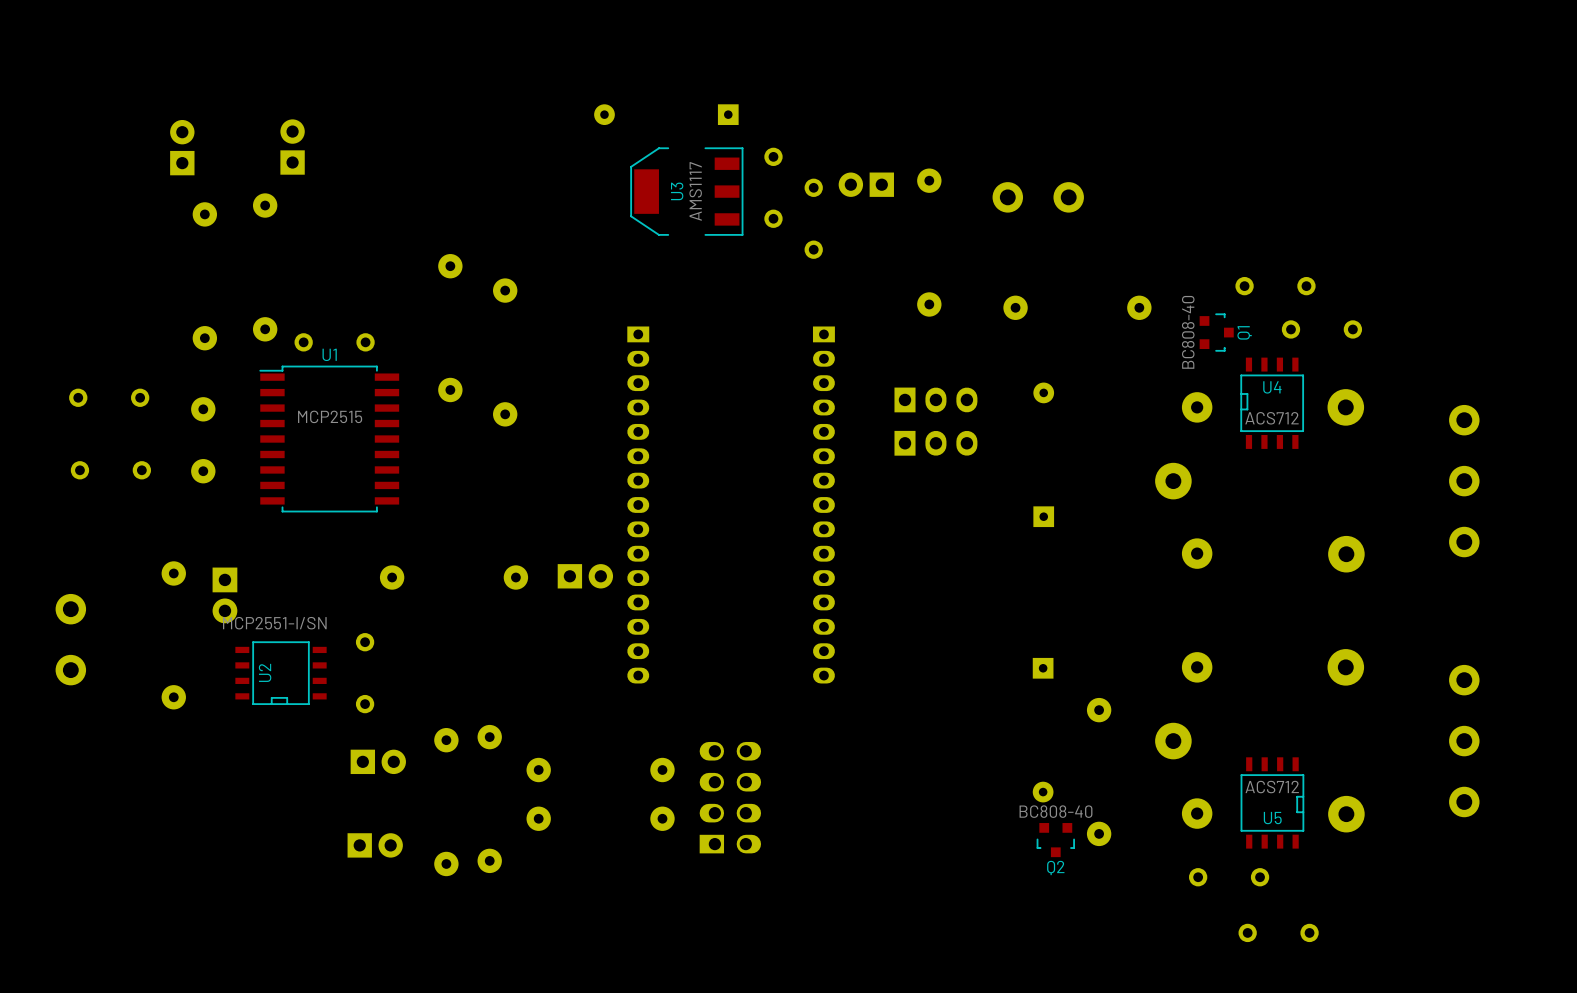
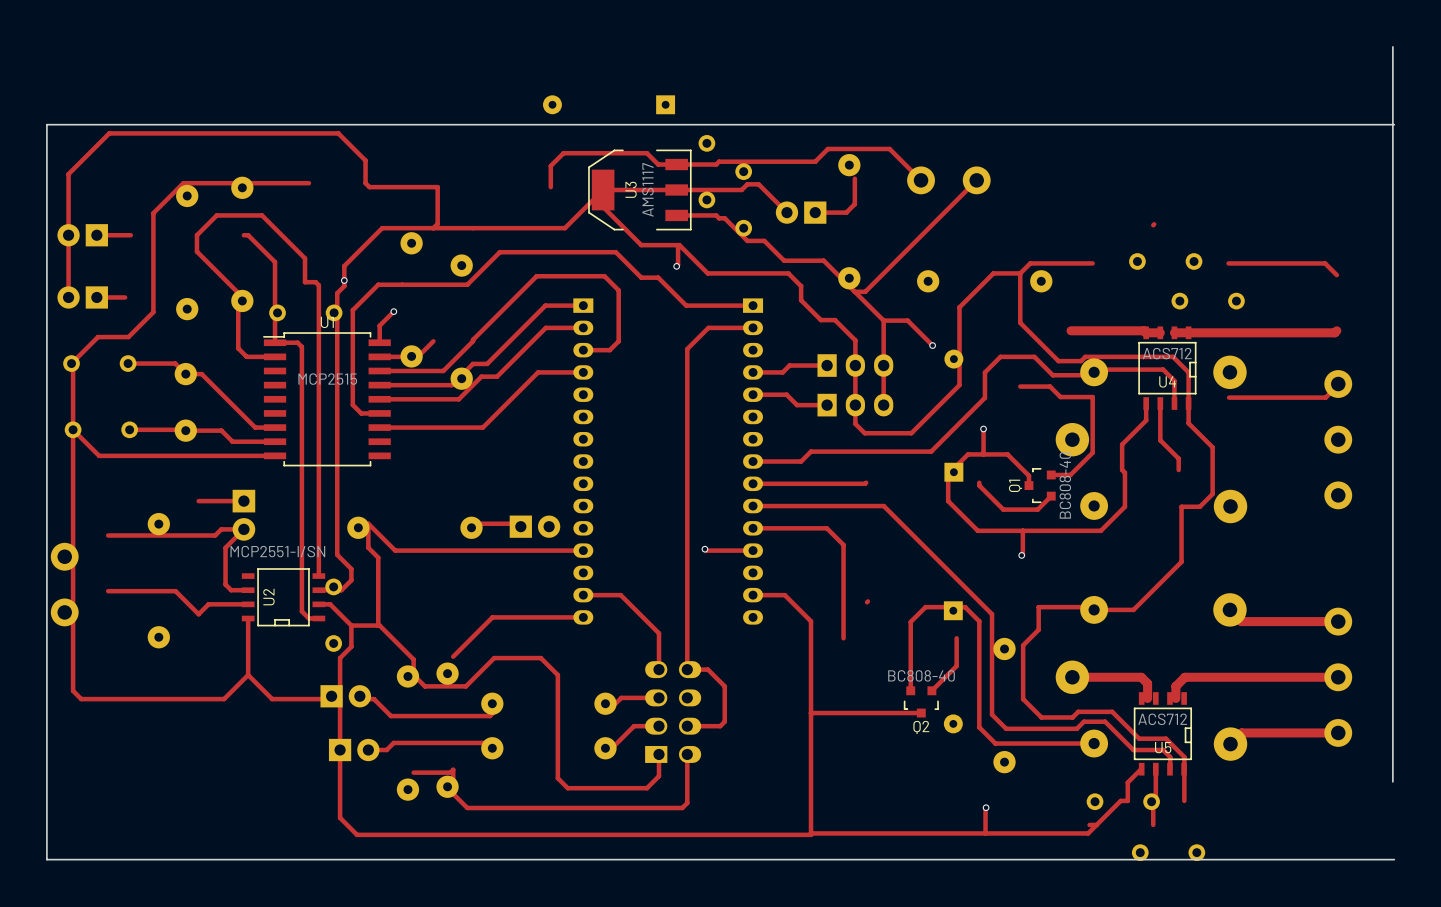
board edge: none -> (1392, 46) (1392, 781)
board edge: none -> (1394, 124) (46, 124) (46, 859) (1394, 859)
part: (182, 147) -> none
part: (292, 147) -> none
part position: (866, 184) -> (801, 212)
U3 position: (686, 191) -> (639, 189)
track: none -> (854, 178) (854, 204) (846, 212) (815, 212)
track: none -> (921, 180) (889, 148) (827, 148) (815, 161) (719, 161) (716, 164) (658, 164) (646, 153) (563, 153) (550, 165) (550, 187)
track: none -> (976, 180) (865, 291) (854, 291)
track: none -> (308, 183) (183, 183) (153, 213) (153, 312) (128, 337) (98, 337) (71, 363) (73, 365) (73, 690) (81, 699) (224, 699) (248, 675)
track: none -> (603, 189) (564, 228) (382, 228) (344, 266) (344, 286) (337, 293) (337, 554) (351, 568) (351, 580) (341, 590) (318, 590)
track: none -> (603, 189) (603, 206) (641, 245) (679, 245) (707, 273) (788, 273) (801, 286) (801, 300) (820, 320) (835, 320) (855, 340) (855, 423) (864, 433) (911, 433) (959, 385) (959, 307) (993, 273) (1020, 273)
track: none -> (603, 189) (741, 189) (747, 184) (758, 184) (786, 212)
track: none -> (676, 215) (716, 215) (719, 218) (724, 218) (747, 240) (764, 240) (784, 260) (823, 260) (883, 320)
track: none -> (1154, 224) (1153, 225)
track: none -> (433, 228) (437, 223) (437, 187) (369, 187) (365, 183) (365, 160) (338, 133) (109, 133) (68, 174) (68, 297)
part: none -> (82, 235)
track: none -> (96, 235) (130, 235)
track: none -> (243, 235) (248, 235) (275, 262) (275, 342) (297, 342) (301, 346) (301, 611) (308, 618) (318, 618)
track: none -> (678, 245) (676, 266)
track: none -> (1092, 263) (1030, 263) (1020, 273)
track: none -> (1228, 263) (1325, 263) (1336, 275)
via: none -> (676, 266)
track: none -> (1020, 273) (1020, 322) (1058, 361) (1081, 361) (1085, 356) (1173, 356) (1188, 372) (1188, 423) (1212, 447) (1212, 494) (1199, 506) (1181, 506) (1181, 561) (1133, 609) (1094, 609) (1091, 607) (1038, 607) (1038, 629) (1023, 645) (1023, 699) (1041, 717) (1072, 717) (1078, 711) (1112, 711) (1139, 738) (1165, 738) (1184, 757) (1184, 800)
via: none -> (344, 280)
part: none -> (82, 297)
track: none -> (96, 297) (125, 297)
Q1 rotation: 0° (1216, 332) -> 180° (1040, 485)
Q1 position: (1216, 332) -> (1040, 485)
track: none -> (583, 305) (545, 305) (487, 363) (473, 363) (451, 385) (379, 385)
track: none -> (753, 305) (686, 305) (658, 277) (641, 277) (615, 252) (499, 252) (467, 284) (378, 284) (352, 310) (352, 404) (361, 413) (379, 413)
track: none -> (393, 311) (379, 325) (379, 342)
via: none -> (393, 311)
track: none -> (883, 320) (907, 320) (932, 345)
track: none -> (883, 320) (883, 405)
track: none -> (583, 327) (545, 327) (497, 376) (481, 376) (458, 399) (379, 399)
track: none -> (753, 327) (708, 327) (687, 349) (687, 669) (707, 669) (724, 686) (724, 721) (720, 726) (687, 726)
track: none -> (1070, 330) (1144, 330) (1146, 332) (1160, 332)
track: none -> (1336, 330) (1334, 332) (1174, 332)
track: none -> (433, 341) (417, 356) (379, 356)
via: none -> (932, 345)
track: none -> (583, 350) (609, 350) (618, 341) (618, 290) (604, 276) (536, 276) (443, 371) (379, 371)
track: none -> (275, 356) (246, 356) (238, 348) (238, 292) (196, 251) (196, 235) (216, 215) (262, 215) (305, 258) (305, 282) (315, 282) (318, 285) (318, 576)
track: none -> (128, 363) (175, 363) (185, 374) (201, 374) (255, 427) (275, 427)
track: none -> (827, 365) (789, 365) (782, 372) (753, 372)
U4 rotation: 0° (1272, 403) -> 180° (1167, 368)
track: none -> (583, 372) (538, 372) (482, 427) (379, 427)
track: none -> (1020, 386) (1050, 386) (1060, 397) (1092, 397) (1092, 452) (1070, 474) (1051, 474)
track: none -> (1336, 386) (1325, 397) (1229, 397)
track: none -> (753, 394) (786, 394) (797, 405) (827, 405)
U1 position: (329, 439) -> (326, 399)
track: none -> (1146, 403) (1146, 420) (1122, 444) (1122, 470) (1124, 472) (1124, 506) (1100, 530) (977, 530) (948, 501) (948, 474) (967, 454) (1007, 454) (1028, 475) (1028, 485)
track: none -> (1160, 403) (1160, 440) (1178, 458) (1178, 470)
track: none -> (1174, 403) (1174, 380) (1163, 369) (1089, 369) (1083, 375) (1052, 375) (1034, 356) (1000, 356) (984, 372) (984, 397) (931, 451) (811, 451) (801, 461) (753, 461)
track: none -> (983, 428) (983, 454)
via: none -> (983, 428)
track: none -> (73, 429) (99, 455) (275, 455)
track: none -> (129, 429) (221, 430) (232, 441) (275, 441)
track: none -> (866, 482) (753, 483)
track: none -> (979, 482) (979, 485) (1003, 509) (1037, 509) (1051, 496)
track: none -> (198, 501) (243, 501)
track: none -> (753, 506) (883, 506) (992, 614) (992, 714) (1006, 728) (1076, 728) (1083, 721) (1105, 721) (1133, 750) (1163, 750) (1170, 757) (1170, 769)
track: none -> (481, 523) (517, 523) (520, 526)
track: none -> (753, 528) (826, 528) (843, 544) (843, 638)
track: none -> (1022, 530) (1021, 555)
track: none -> (108, 535) (215, 535) (221, 529) (243, 529) (225, 547) (225, 584) (231, 590) (248, 590)
part position: (224, 595) -> (243, 515)
track: none -> (704, 549) (753, 550)
via: none -> (704, 549)
track: none -> (583, 550) (395, 550) (368, 523) (368, 547) (378, 557) (378, 625)
via: none -> (1021, 555)
track: none -> (108, 591) (175, 591) (198, 614) (208, 604) (248, 604)
track: none -> (583, 595) (620, 595) (659, 633) (659, 669)
track: none -> (753, 595) (784, 595) (811, 621) (811, 834) (357, 834) (340, 817) (340, 658) (351, 646) (351, 625)
track: none -> (867, 601) (867, 602)
track: none -> (318, 604) (330, 604) (351, 625)
track: none -> (1229, 609) (1241, 621) (1338, 621)
U2 position: (281, 673) -> (283, 597)
track: none -> (583, 617) (492, 617) (453, 656)
track: none -> (248, 618) (248, 675)
track: none -> (351, 625) (379, 625) (413, 659) (413, 675) (424, 686) (465, 686) (494, 658) (540, 658) (557, 675) (557, 778) (567, 788) (646, 788) (659, 776) (659, 754)
track: none -> (956, 638) (956, 666) (931, 690)
track: none -> (248, 675) (272, 699) (340, 699)
track: none -> (1072, 677) (1141, 677) (1147, 683) (1147, 698)
track: none -> (1338, 677) (1184, 677) (1175, 686) (1175, 698)
track: none -> (910, 690) (910, 621) (925, 607) (965, 607) (979, 621) (979, 727) (995, 743) (1094, 743)
track: none -> (659, 697) (621, 697) (611, 707)
track: none -> (368, 699) (374, 699) (390, 716) (489, 716) (498, 707)
track: none -> (811, 713) (921, 713)
track: none -> (659, 726) (634, 726) (612, 747) (612, 752)
part position: (730, 797) -> (673, 712)
track: none -> (1338, 732) (1241, 732) (1230, 744)
track: none -> (368, 750) (386, 750) (393, 742) (489, 742) (499, 752)
track: none -> (687, 754) (687, 803) (682, 807) (467, 807) (453, 793) (453, 769) (450, 772) (413, 772)
Q2 position: (1055, 840) -> (921, 701)
track: none -> (1141, 769) (1127, 782) (1127, 800) (1120, 800) (1088, 833) (811, 833)
track: none -> (1155, 769) (1155, 804) (1153, 806) (1153, 824)
part position: (375, 845) -> (354, 750)
track: none -> (986, 807) (985, 833)
via: none -> (986, 807)
track: none -> (1089, 824) (1096, 824)

